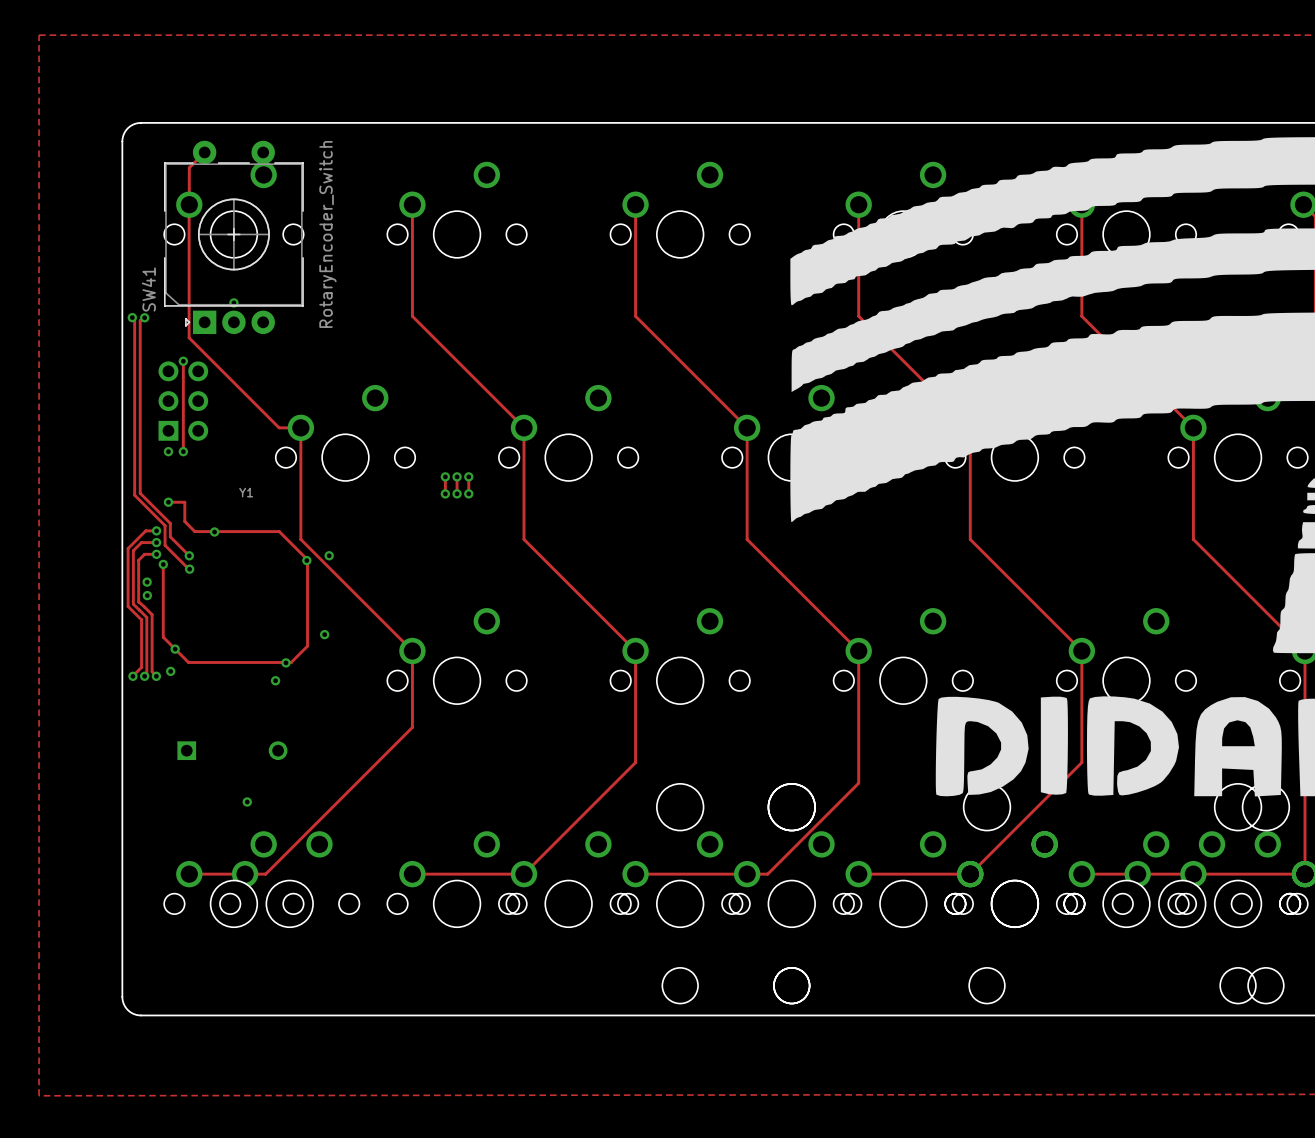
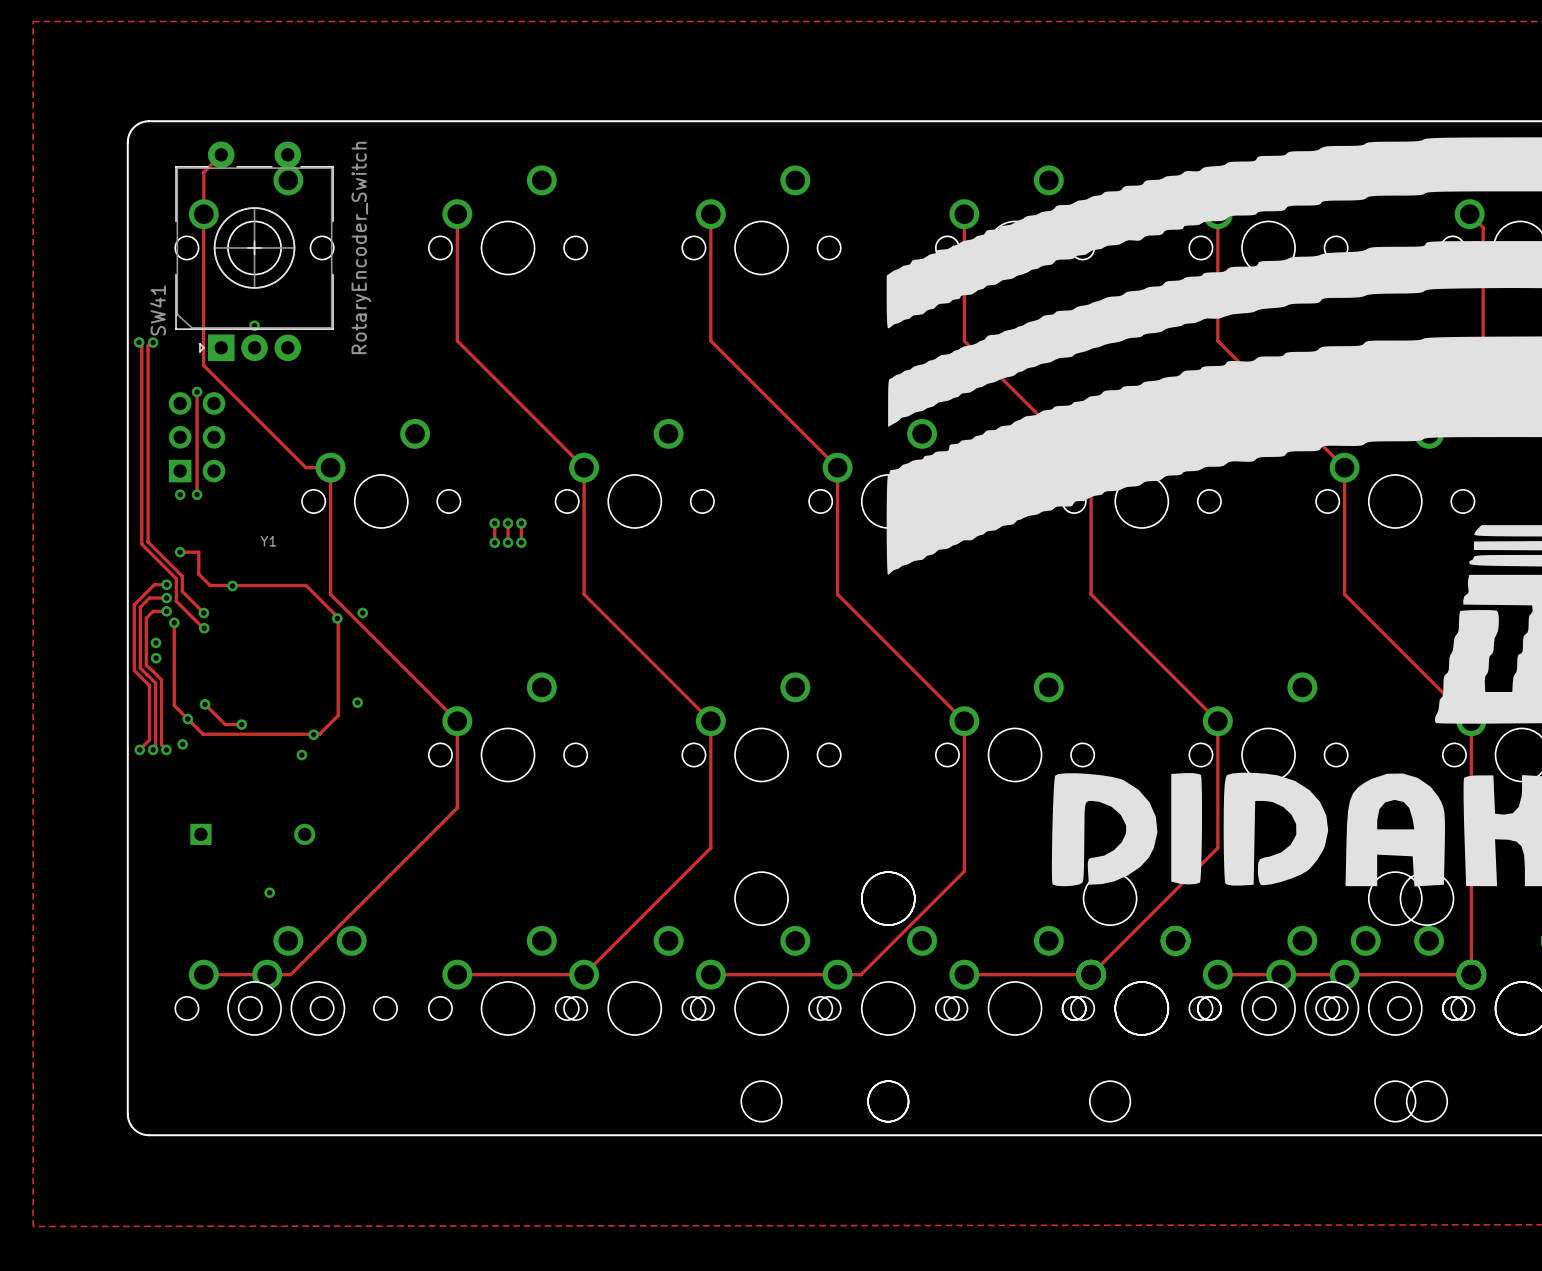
track: none -> (205, 704) (225, 724) (241, 724)
via: none -> (205, 704)
via: none -> (241, 724)

